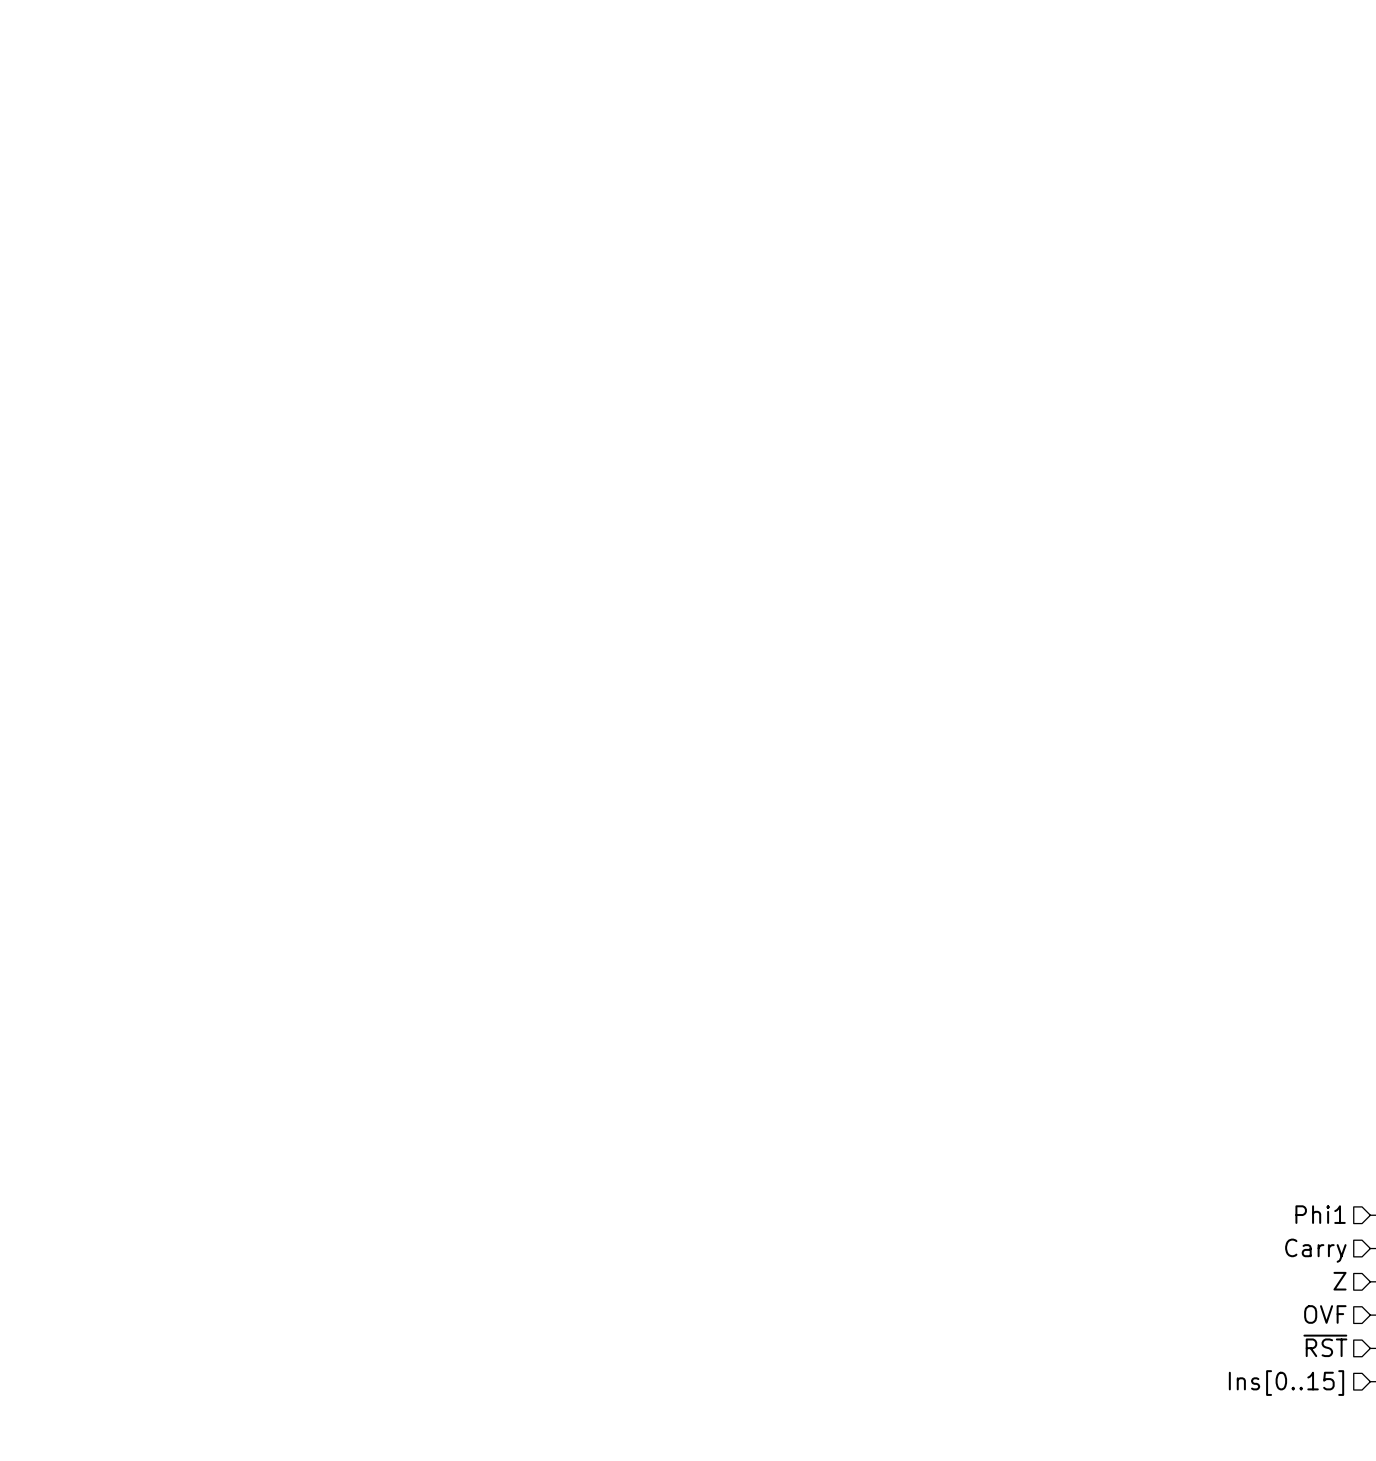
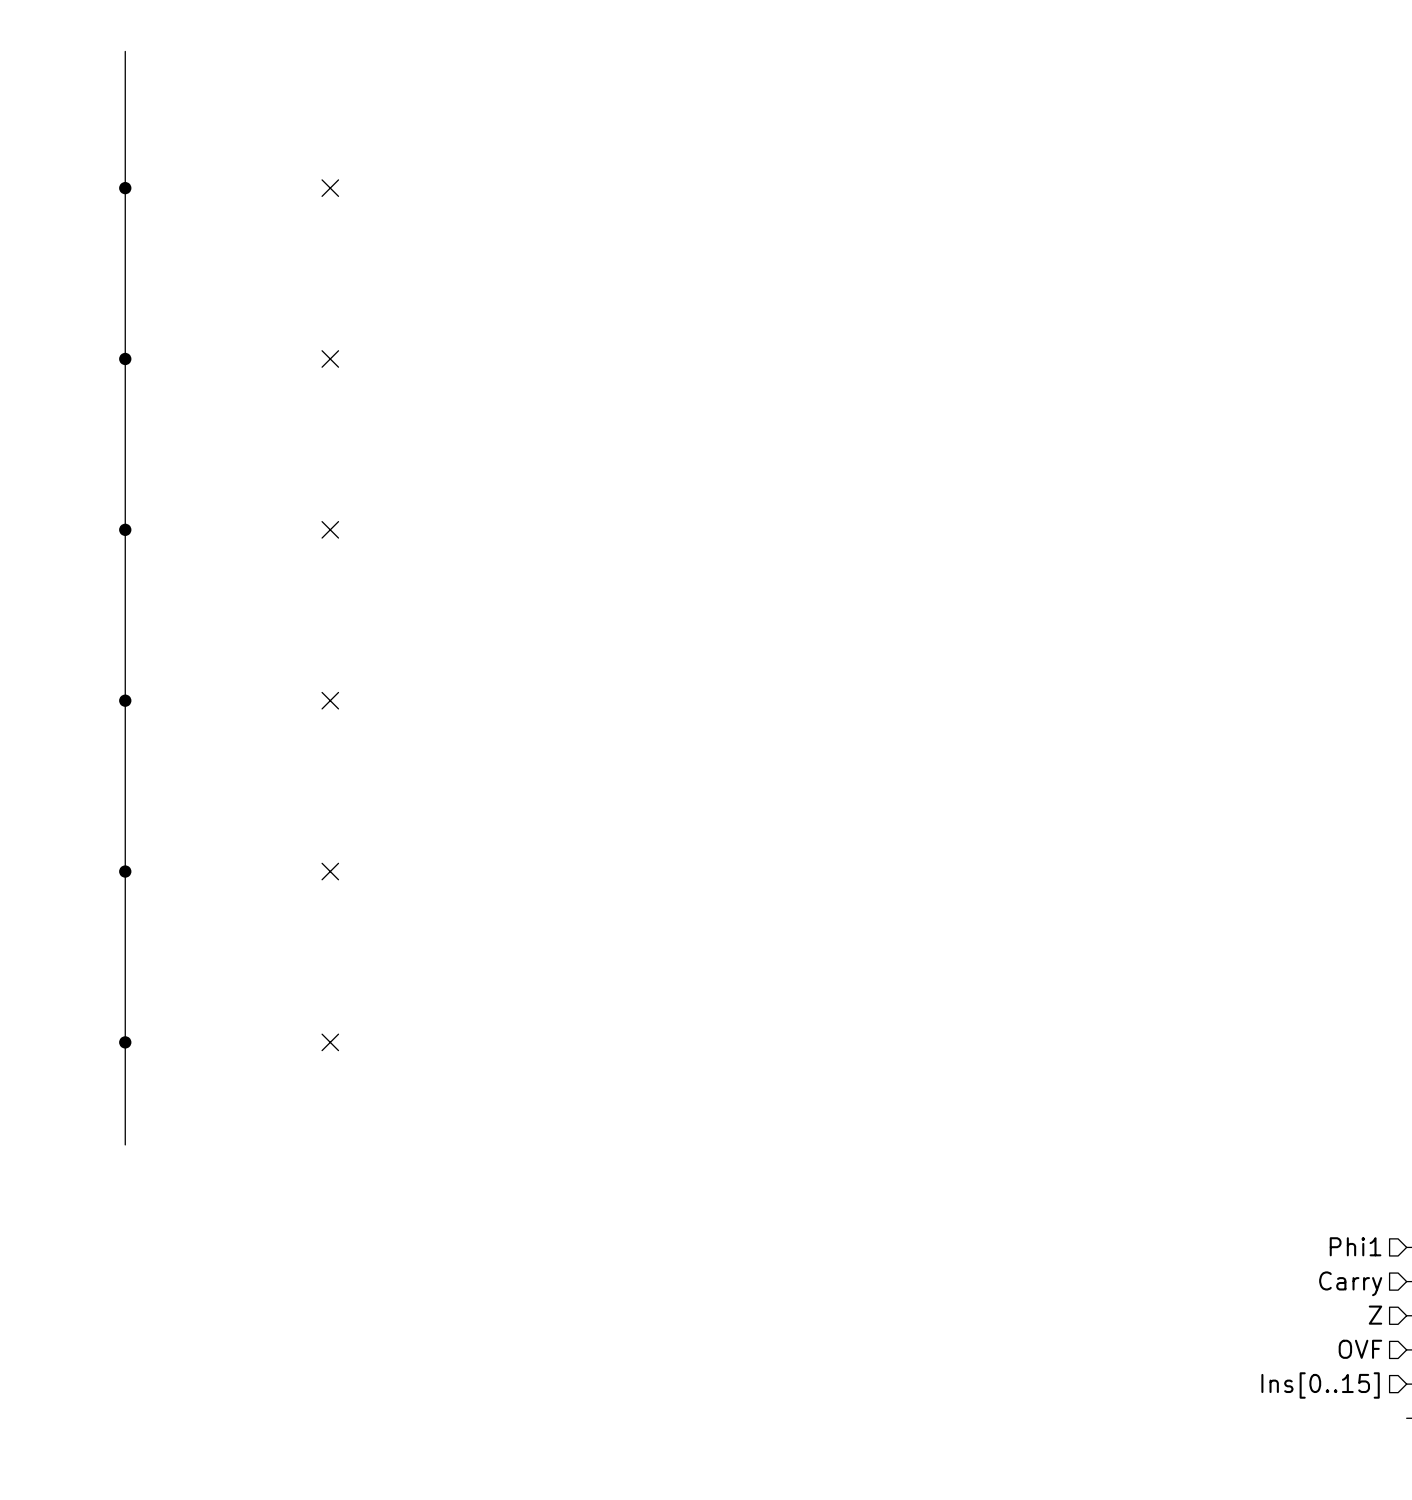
wire: none -> (125, 51) (125, 1144)
junction: none -> (125, 188)
no-connect mark: none -> (330, 188)
junction: none -> (125, 358)
no-connect mark: none -> (330, 358)
junction: none -> (125, 529)
no-connect mark: none -> (330, 529)
junction: none -> (125, 700)
no-connect mark: none -> (330, 700)
junction: none -> (125, 871)
no-connect mark: none -> (330, 871)
junction: none -> (125, 1042)
no-connect mark: none -> (330, 1042)
hierarchical label: ~{RST} (1325, 1345) -> Ins[0..15] (1320, 1385)
hierarchical label: Ins[0..15] (1286, 1383) -> none

